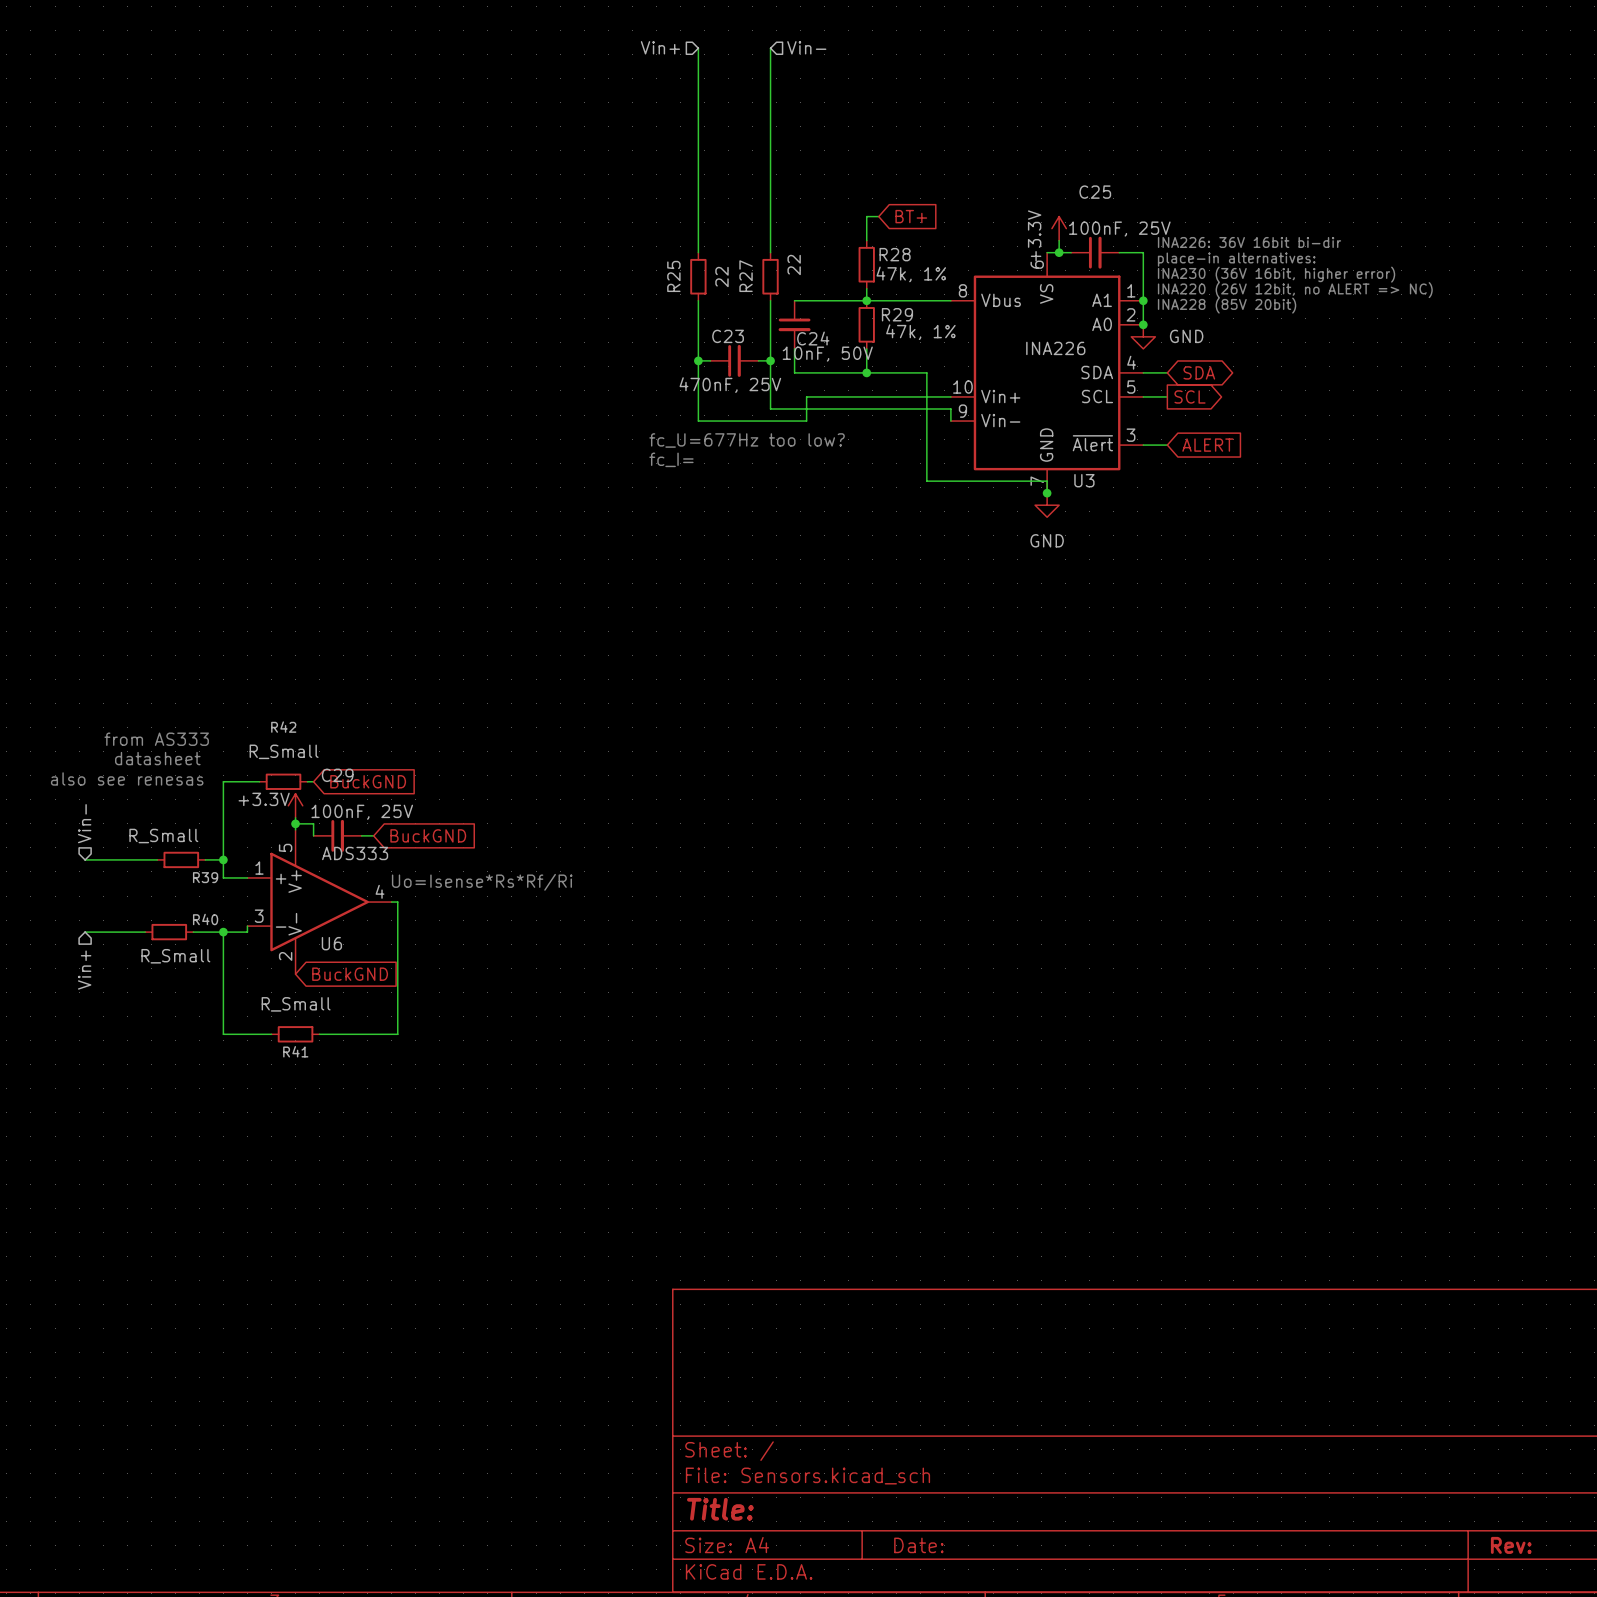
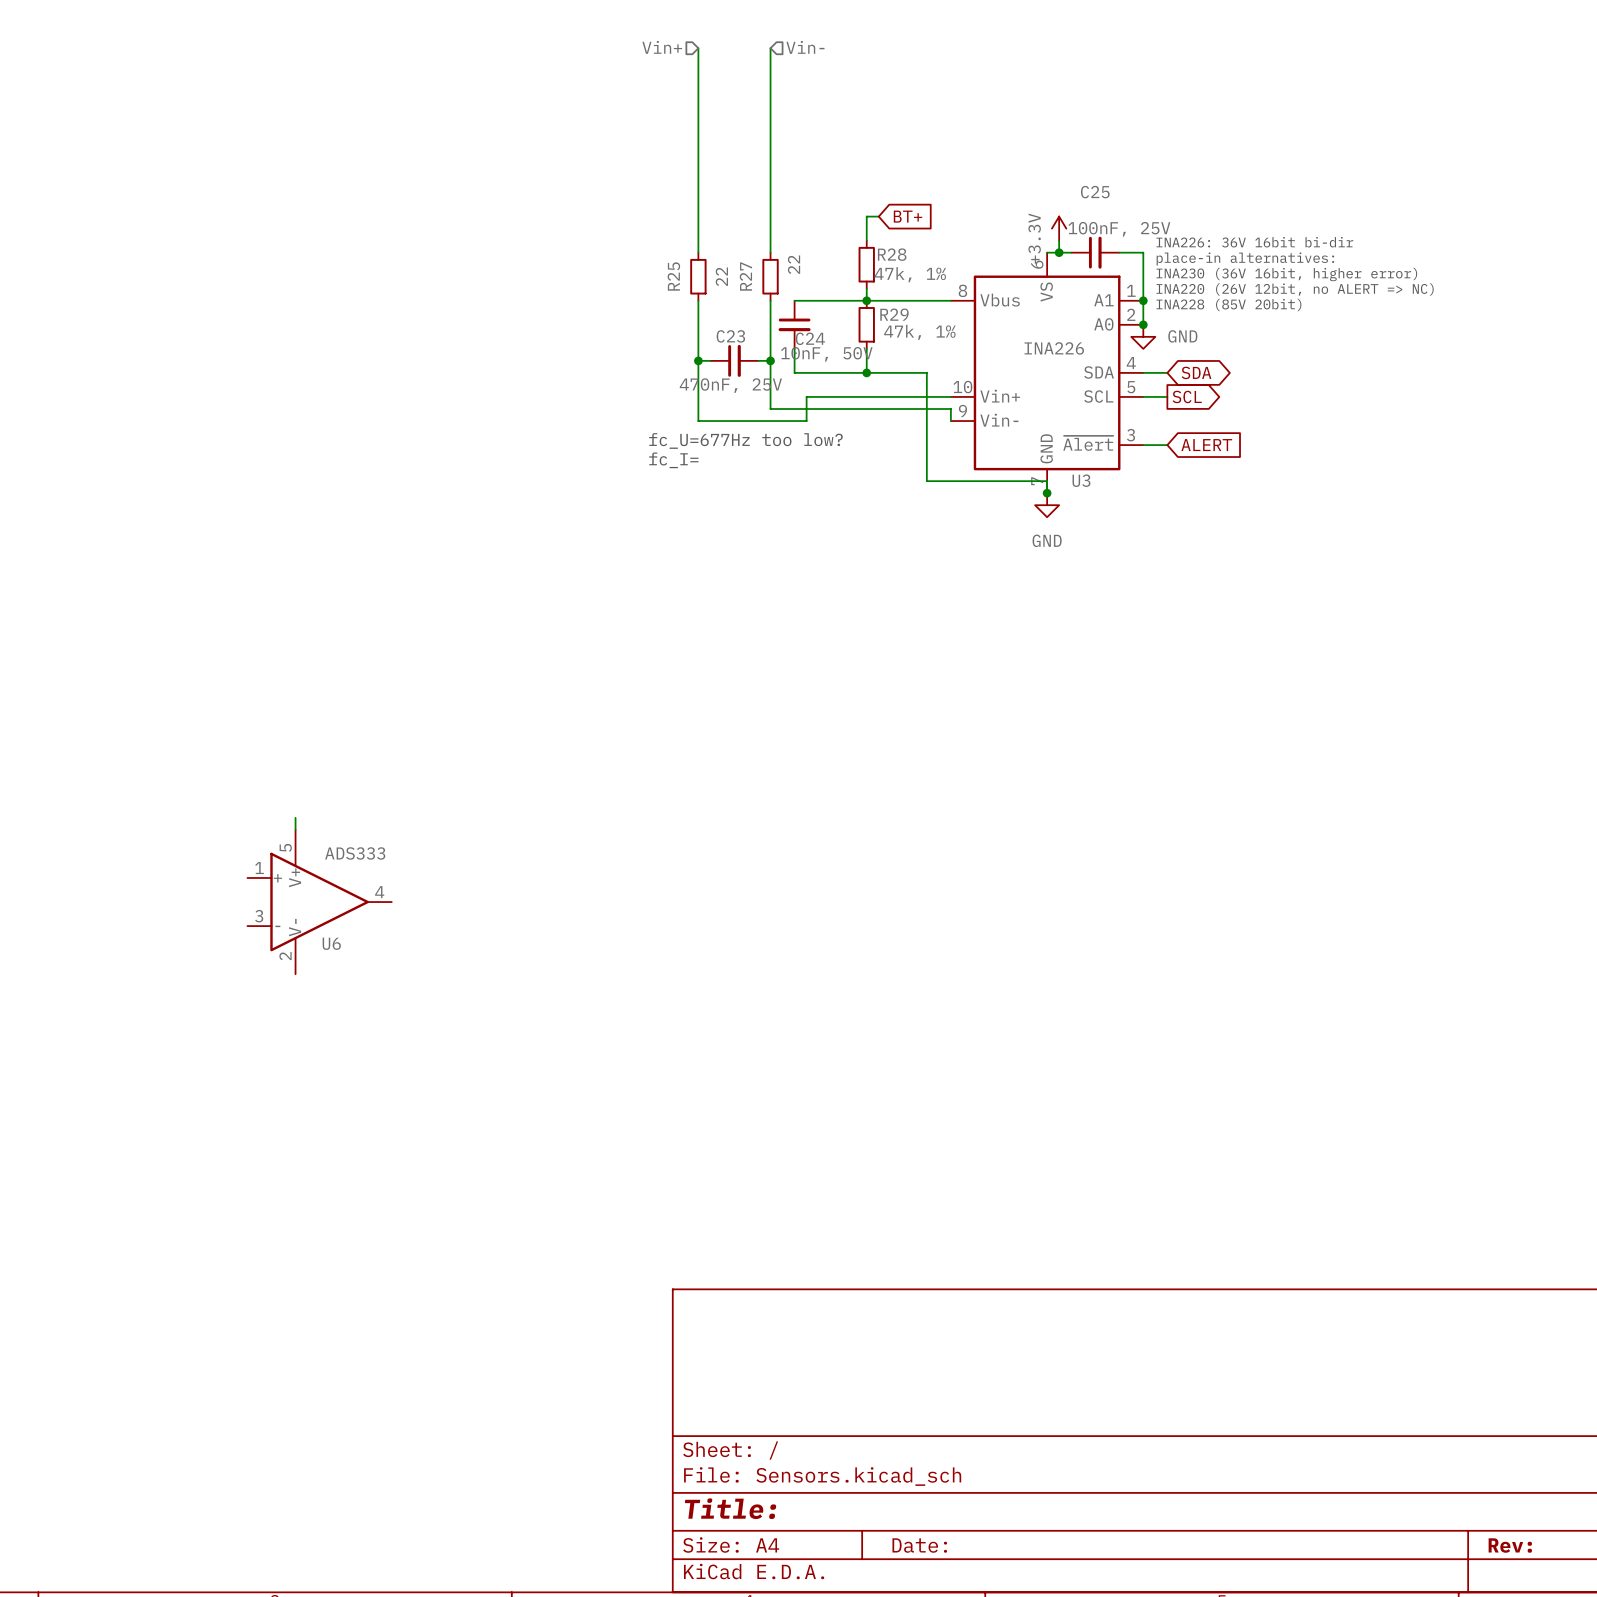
text: from AS333 (156, 739) -> none
text: datasheet (157, 758) -> none
text: also see renesas (127, 778) -> none
wire: (259, 781) (223, 781) (223, 877) (247, 877) -> none
R42: R_Small (283, 781) -> none
wire: (307, 781) (313, 781) -> none
global label: BuckGND (368, 781) -> none
power symbol: +3.3V (295, 805) -> none
hierarchical label: Vin- (84, 823) -> none
wire: (295, 823) (313, 823) (313, 835) -> none
junction: (295, 823) -> none
C29: 100nF, 25V (337, 835) -> none
wire: (361, 835) (373, 835) -> none
global label: BuckGND (428, 835) -> none
wire: (85, 859) (157, 859) -> none
R39: R_Small (181, 859) -> none
wire: (205, 859) (223, 859) -> none
junction: (223, 859) -> none
text: Uo=Isense*Rs*Rf/Ri (482, 882) -> none
wire: (391, 902) (397, 902) (397, 1034) (319, 1034) -> none
wire: (247, 926) (247, 932) (193, 932) -> none
wire: (85, 932) (145, 932) -> none
R40: R_Small (169, 932) -> none
wire: (223, 932) (223, 1034) (271, 1034) -> none
junction: (223, 932) -> none
hierarchical label: Vin+ (84, 970) -> none
global label: BuckGND (350, 974) -> none
R41: R_Small (295, 1034) -> none

